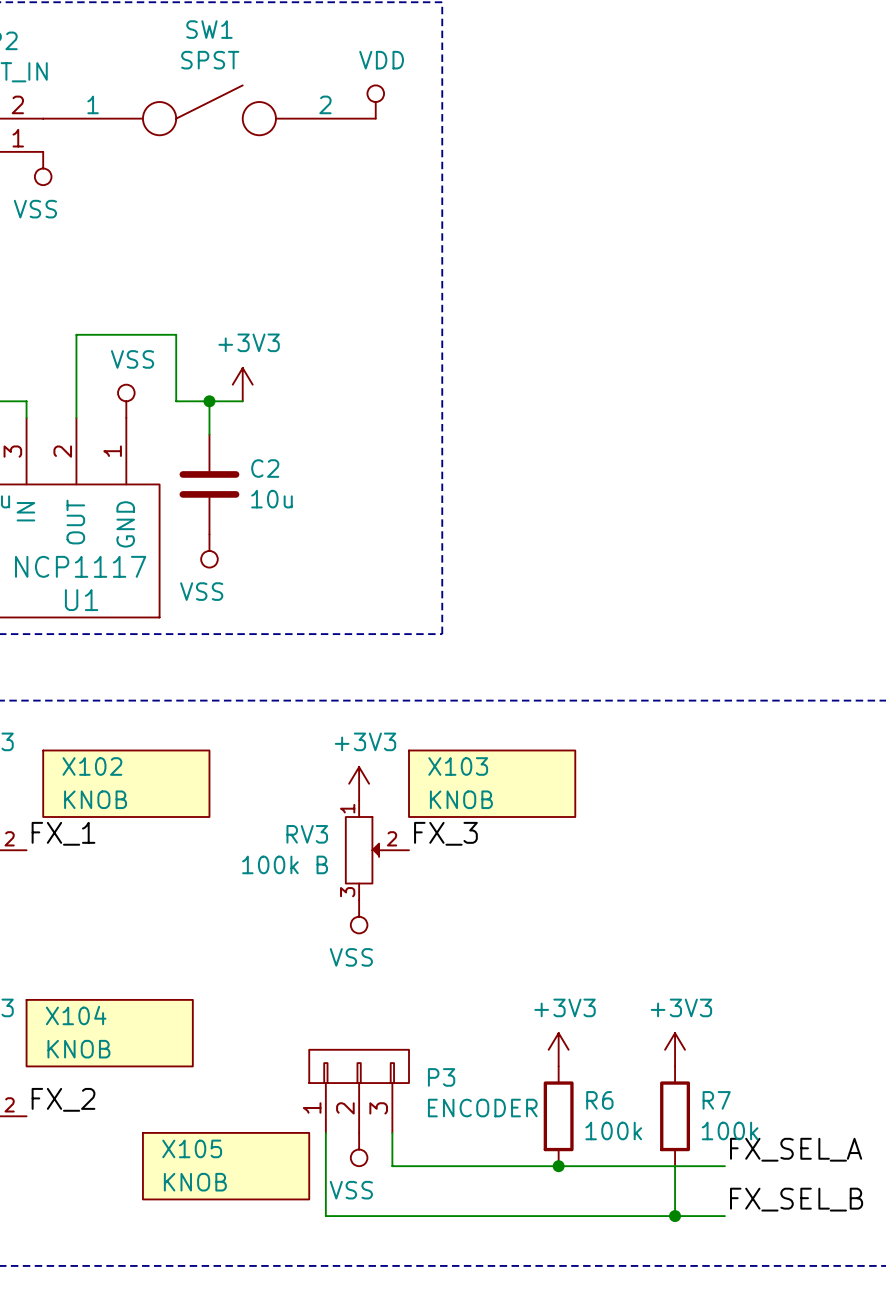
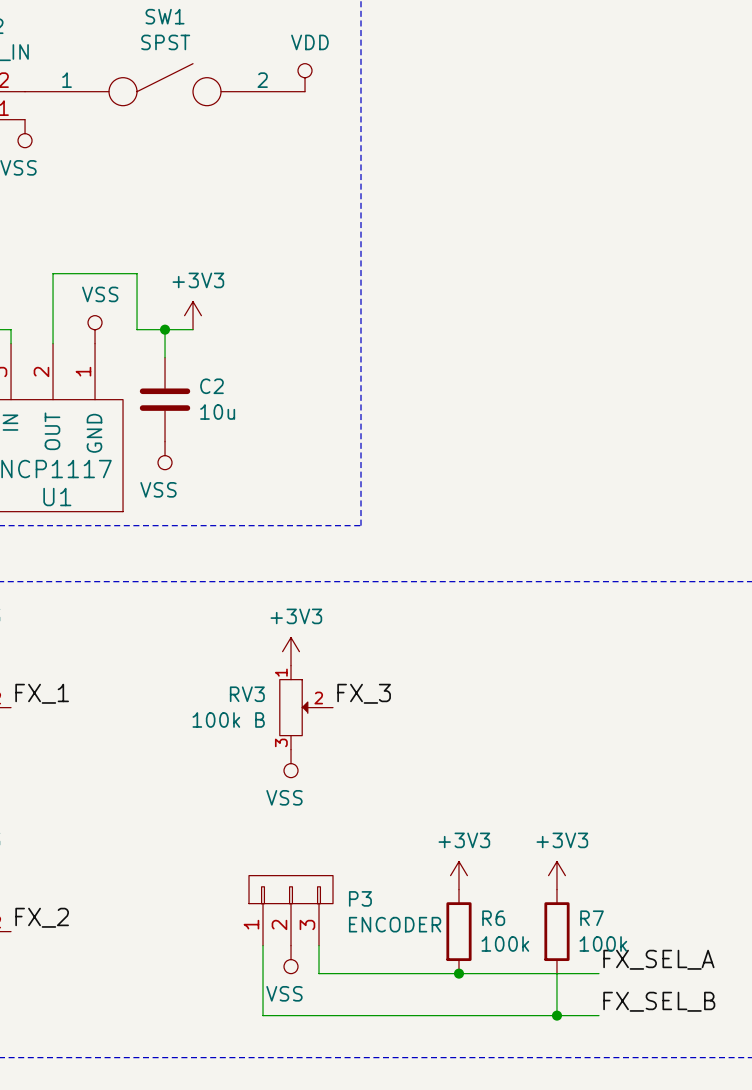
X102: KNOB (126, 783) -> none
X103: KNOB (492, 783) -> none
X104: KNOB (109, 1033) -> none
X105: KNOB (226, 1166) -> none

